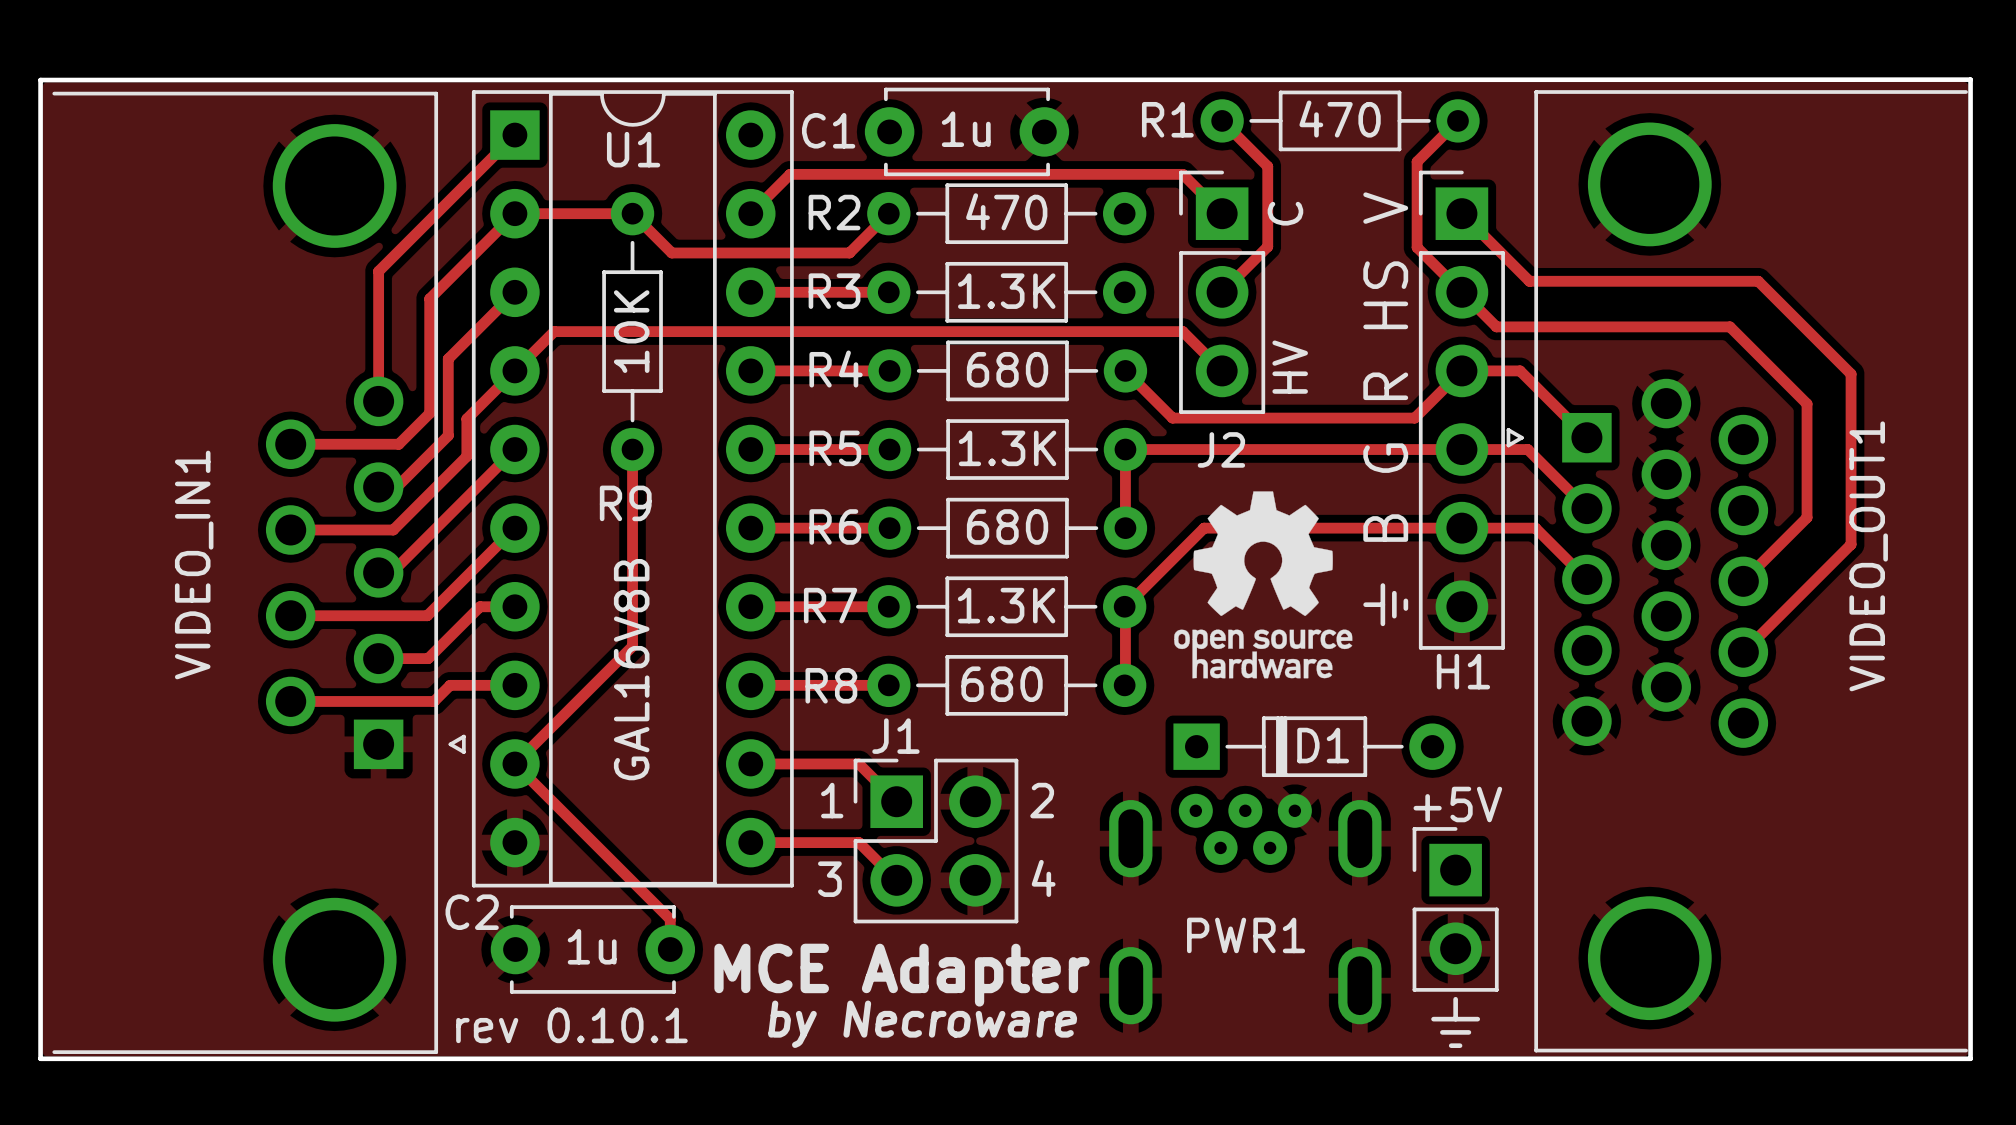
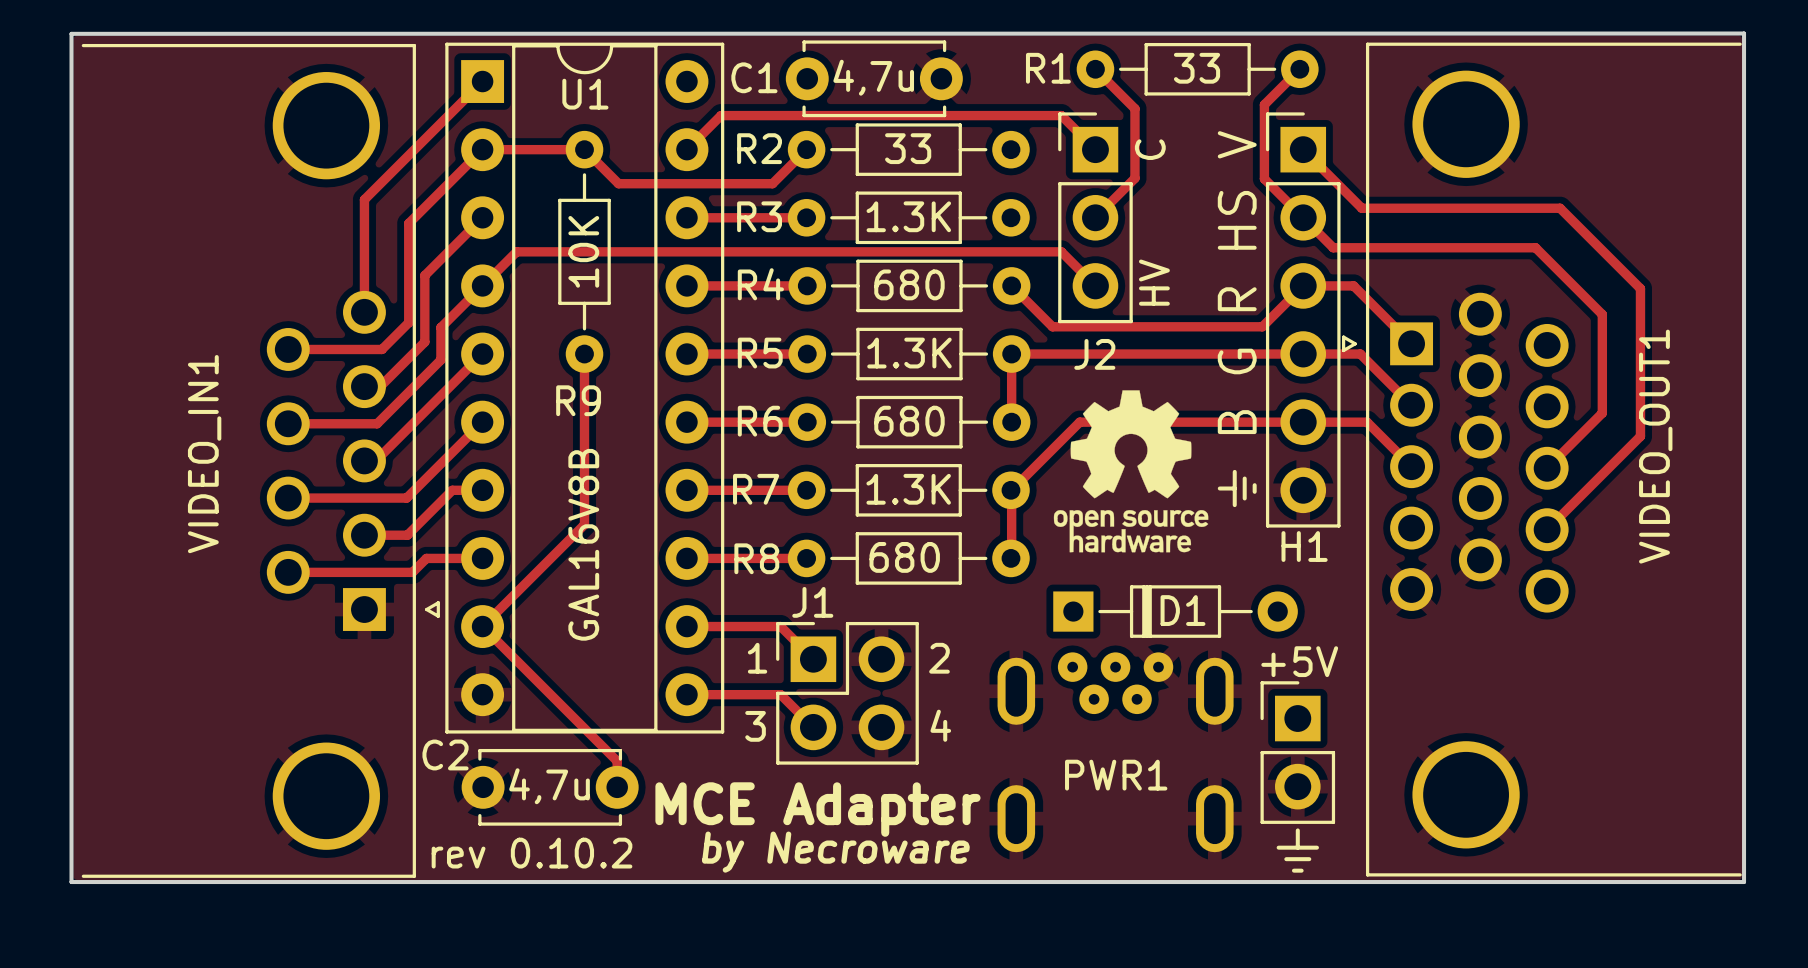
R1 value: 470 (1340, 119) -> 33 (1197, 68)
C1 value: 1u (966, 129) -> 4,7u (873, 77)
R2 value: 470 (1006, 211) -> 33 (908, 148)
C2 value: 1u (592, 946) -> 4,7u (549, 786)
text: rev 0.10.1 (571, 1025) -> rev 0.10.2 (532, 853)

